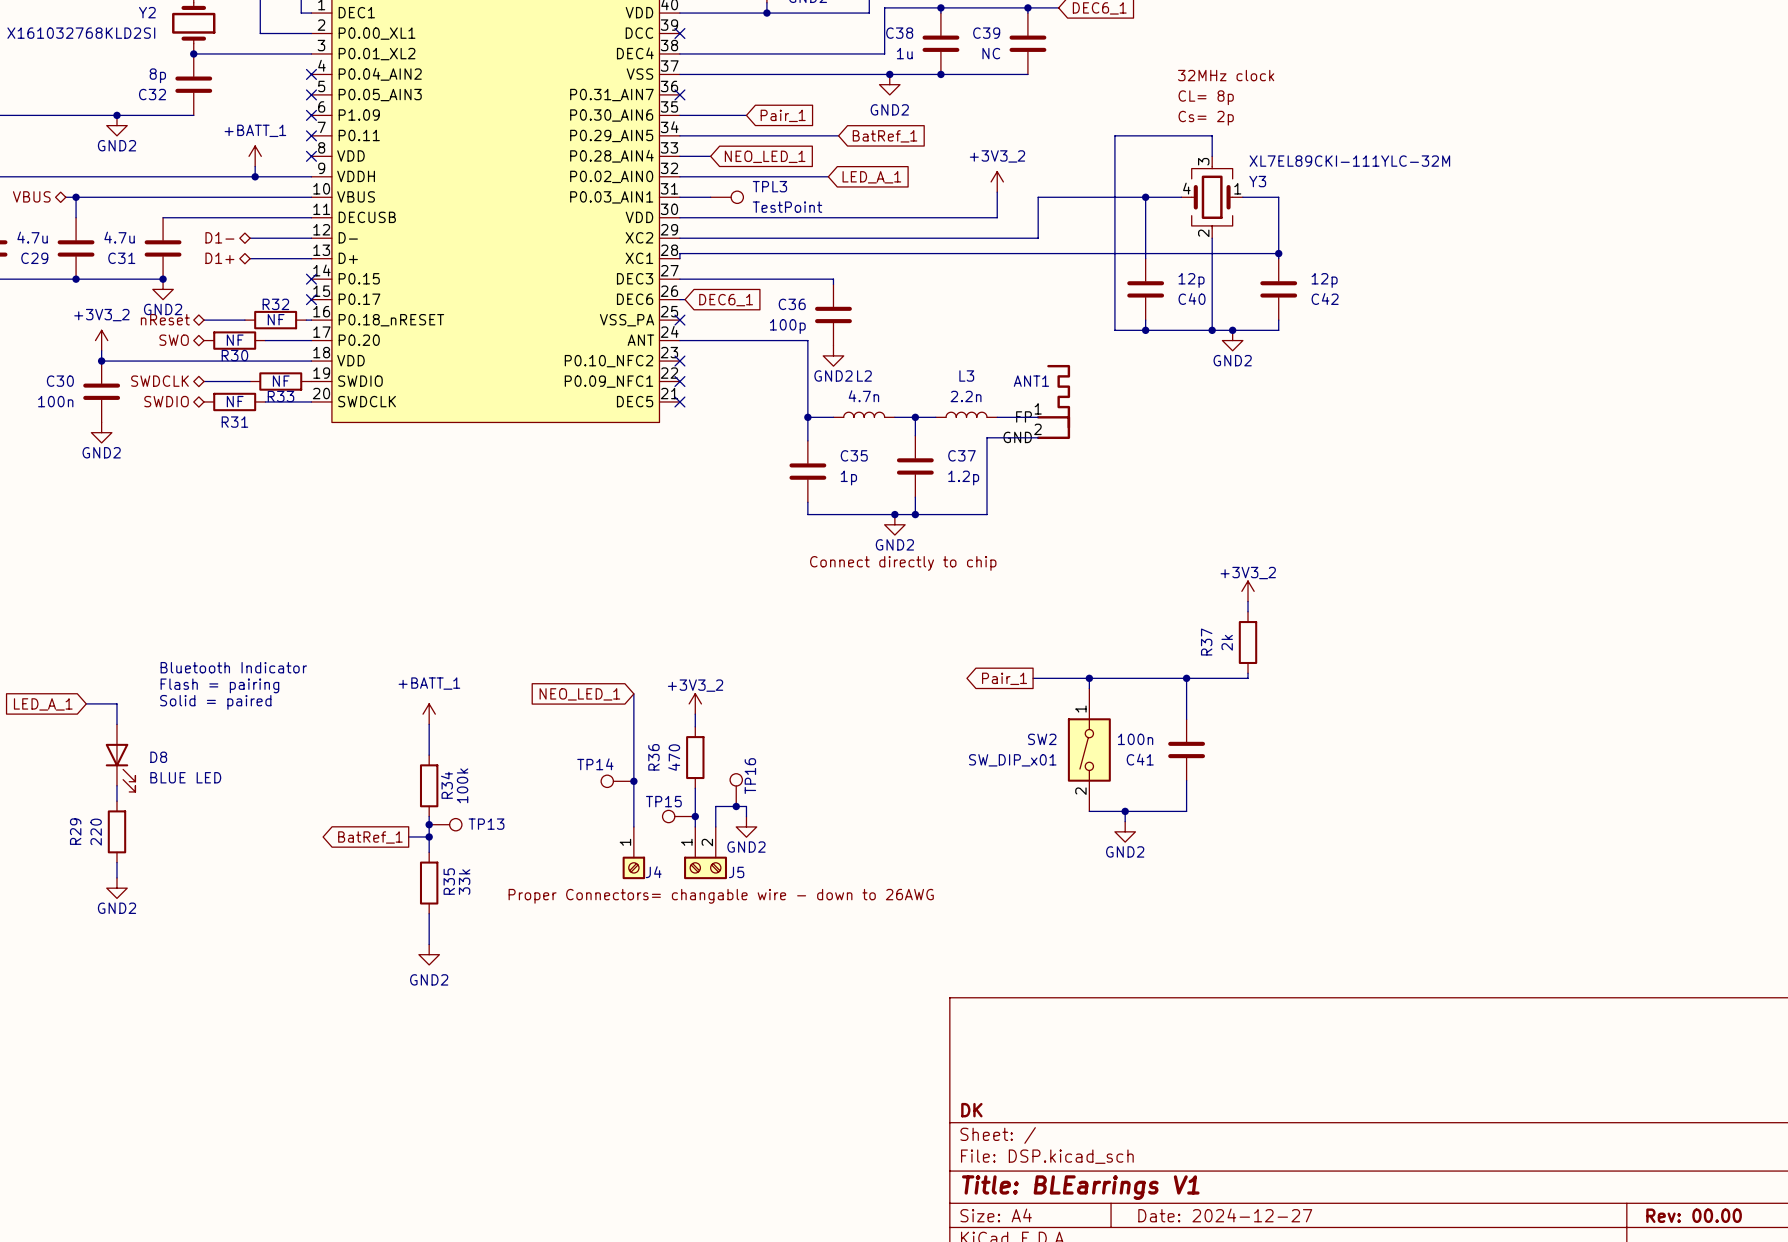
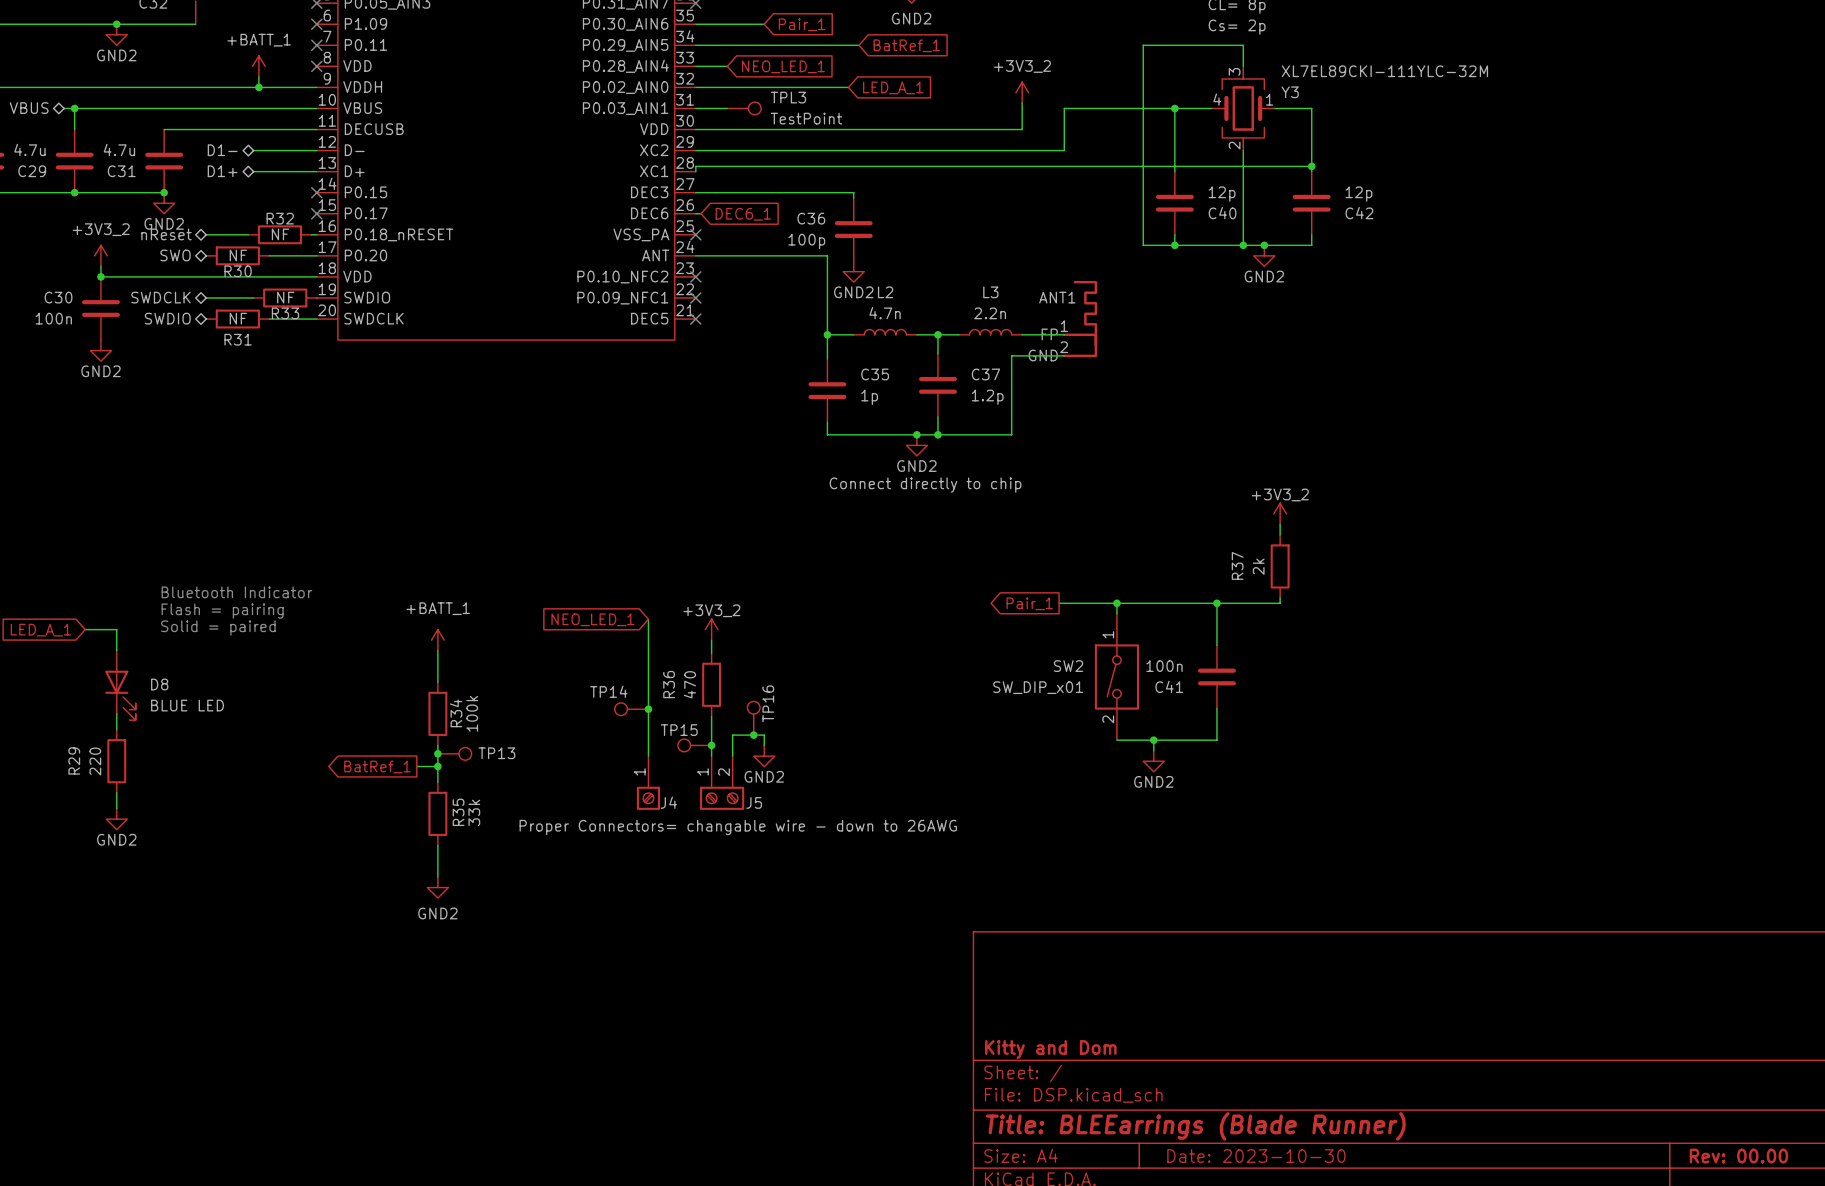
title block: DK (971, 1110) -> Kitty and Dom (1050, 1049)
title block: Title: BLEarrings V1 (1080, 1187) -> Title: BLEEarrings (Blade Runner) (1195, 1126)
title block: Date: 2024-12-27 (1225, 1215) -> Date: 2023-10-30 (1256, 1156)

